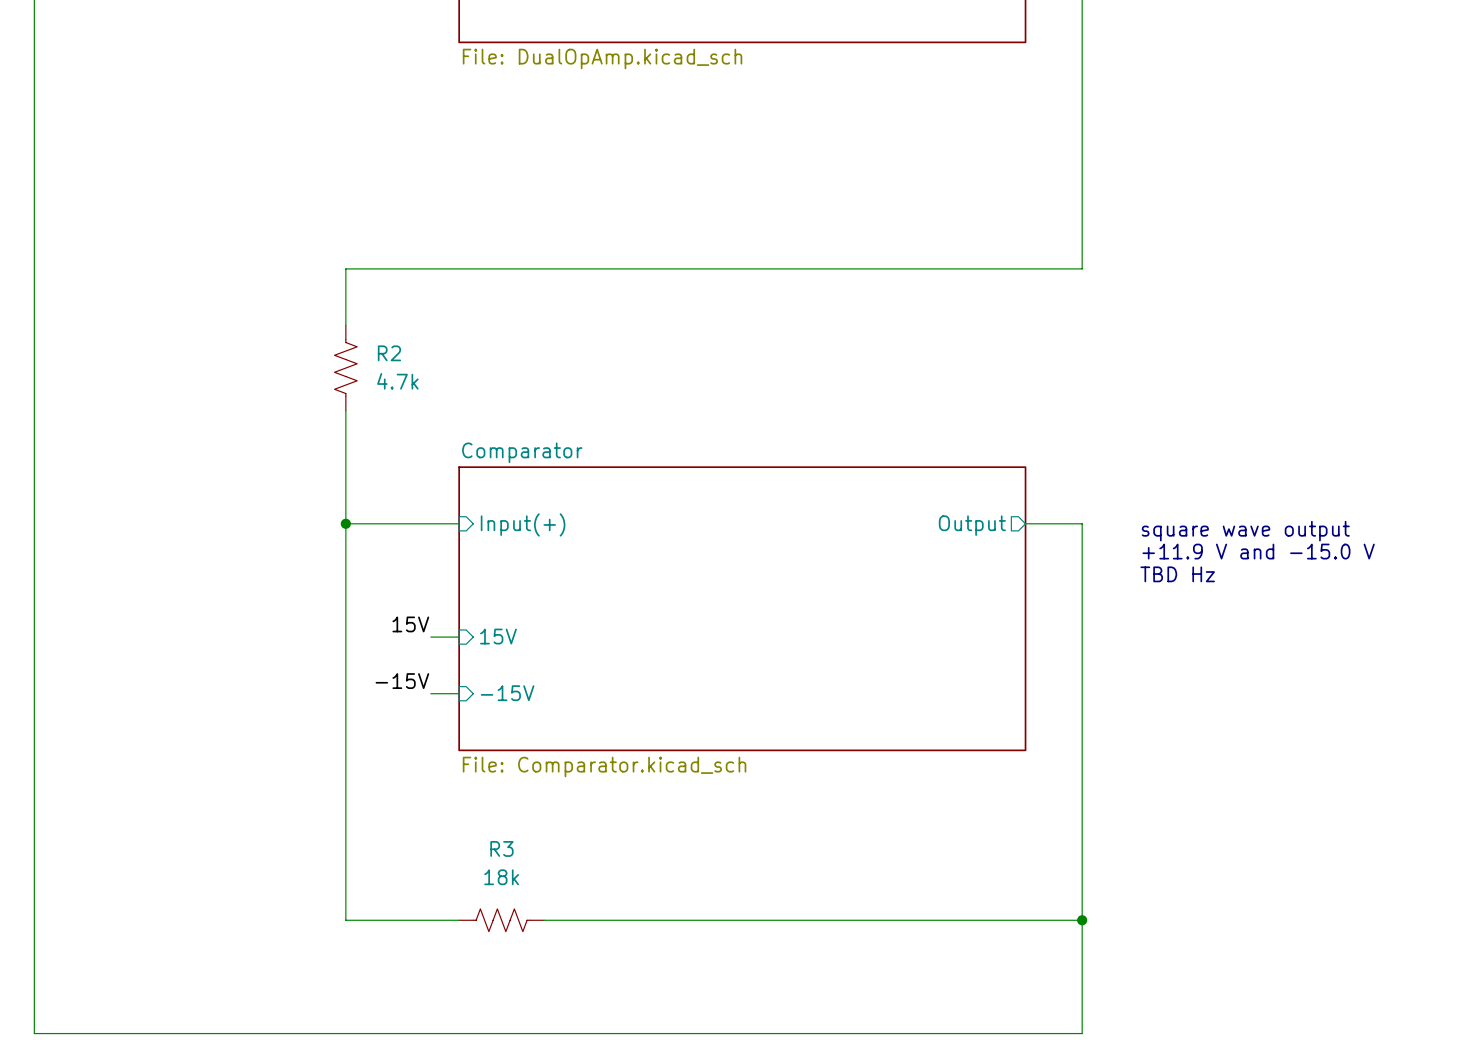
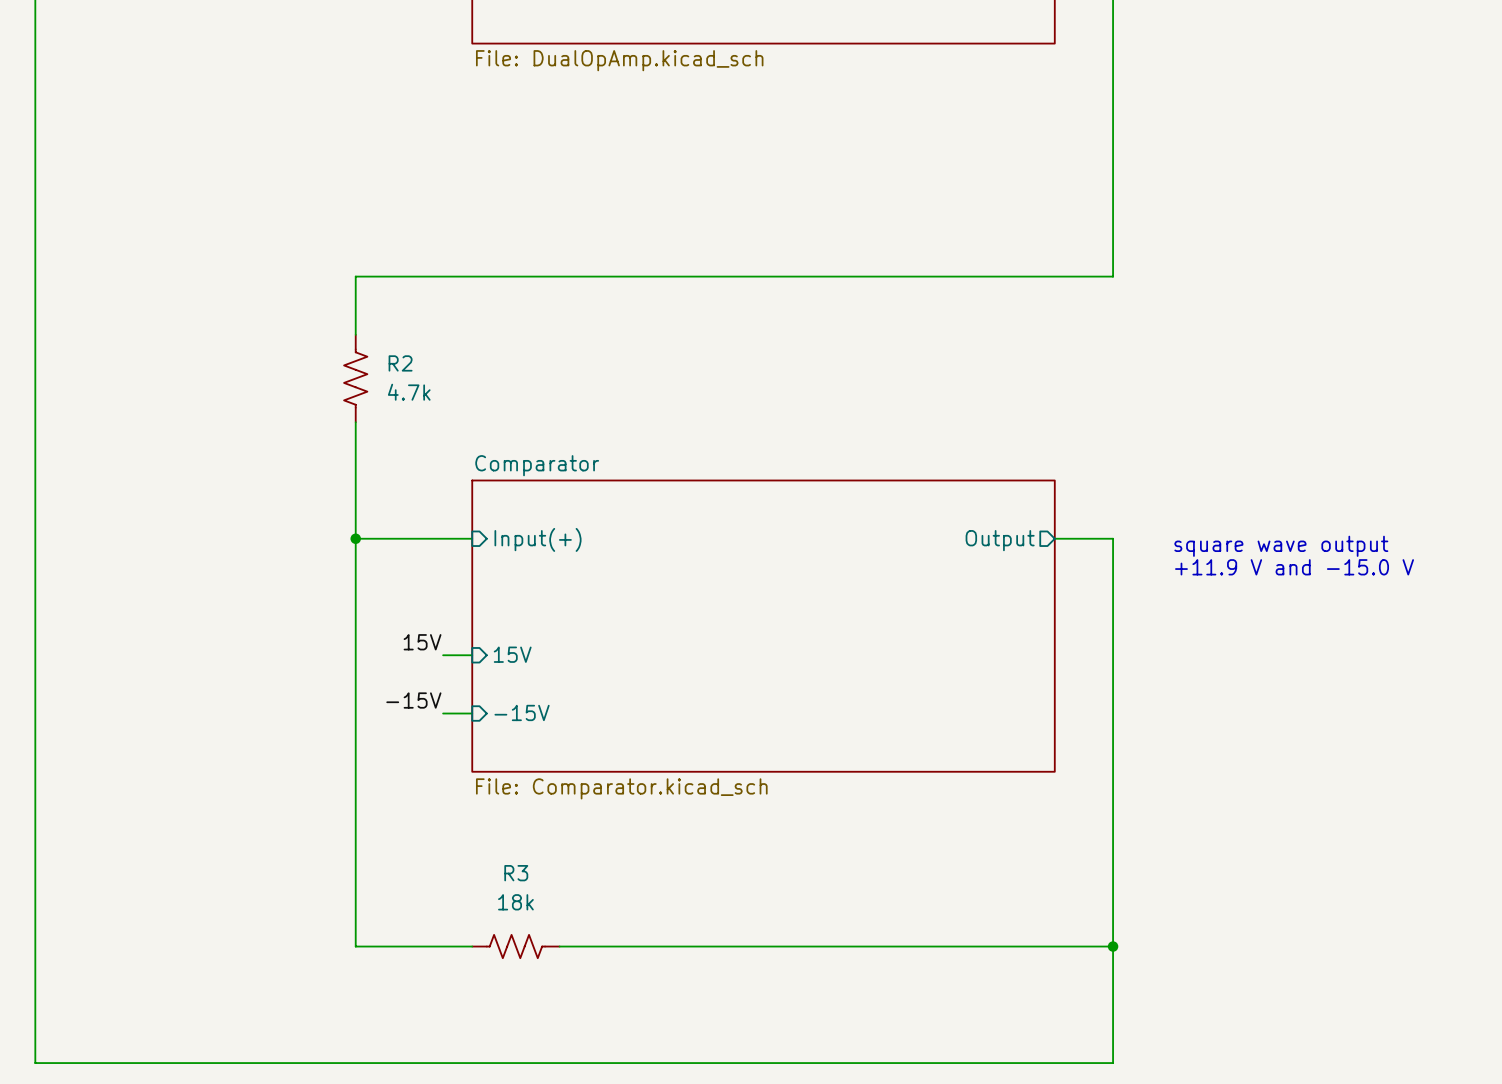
text: TBD Hz (1177, 574) -> none

